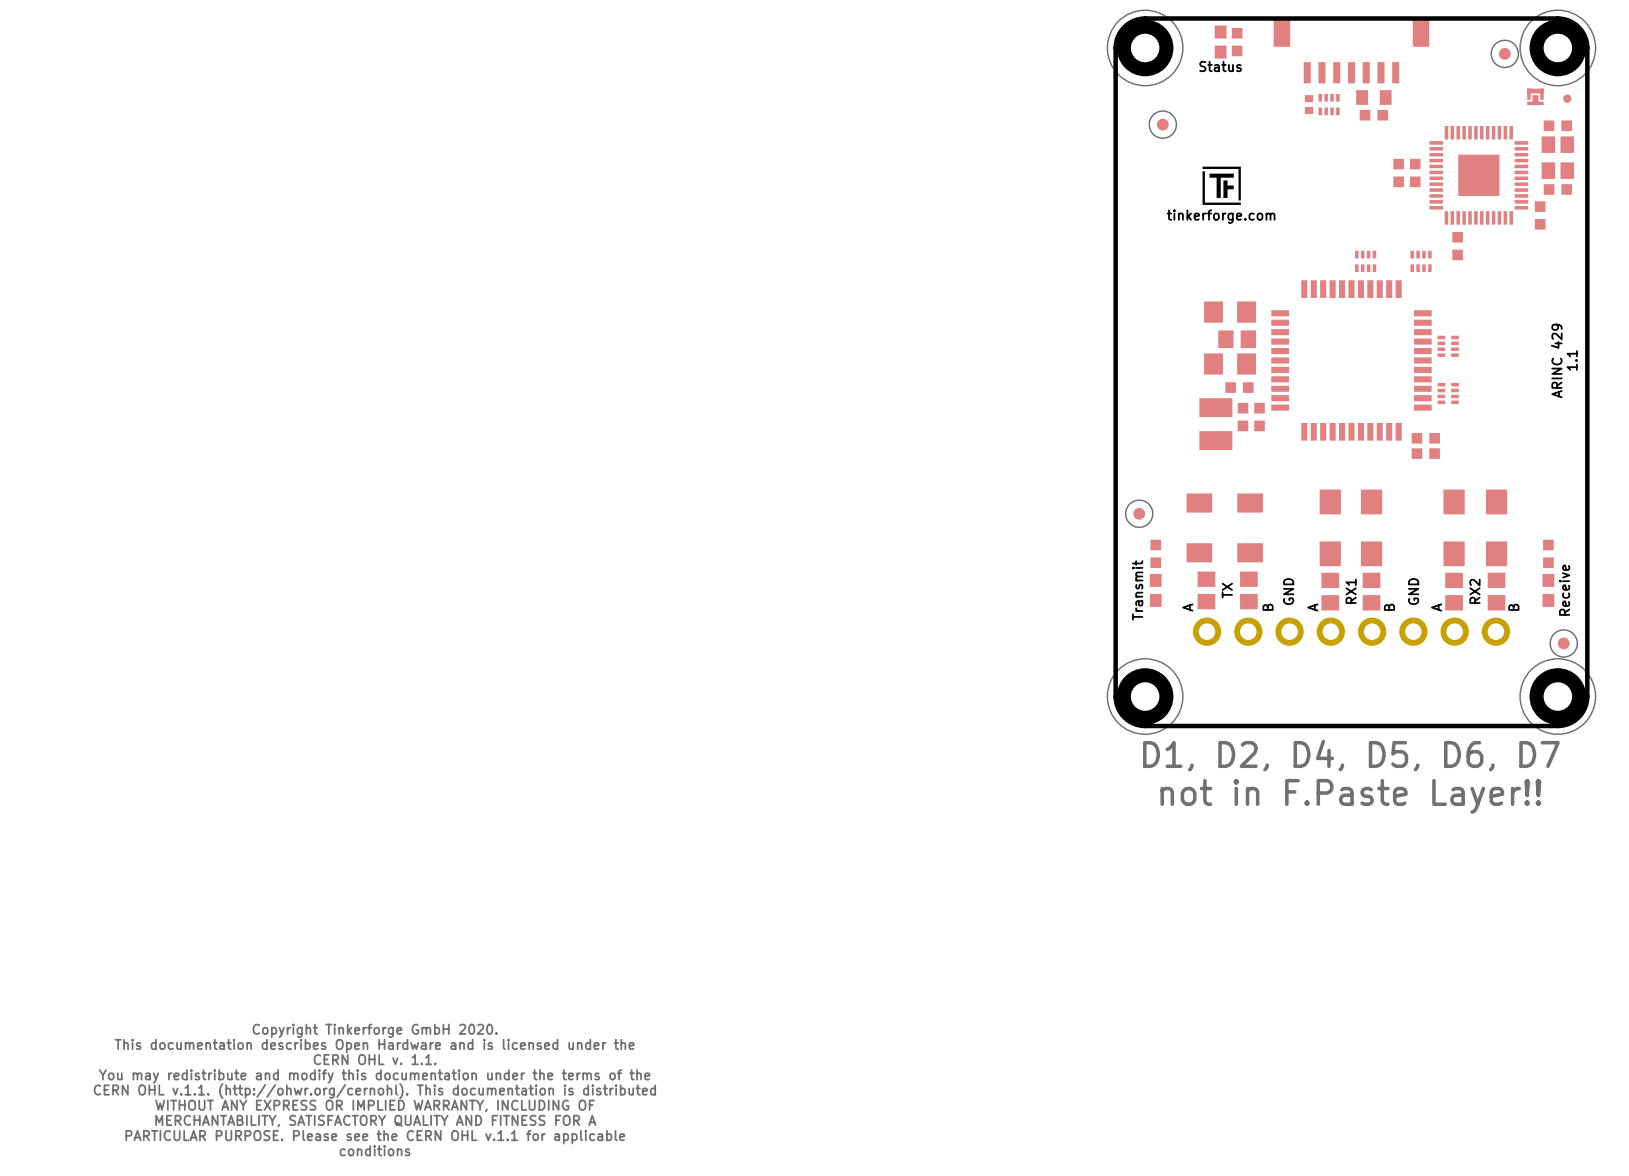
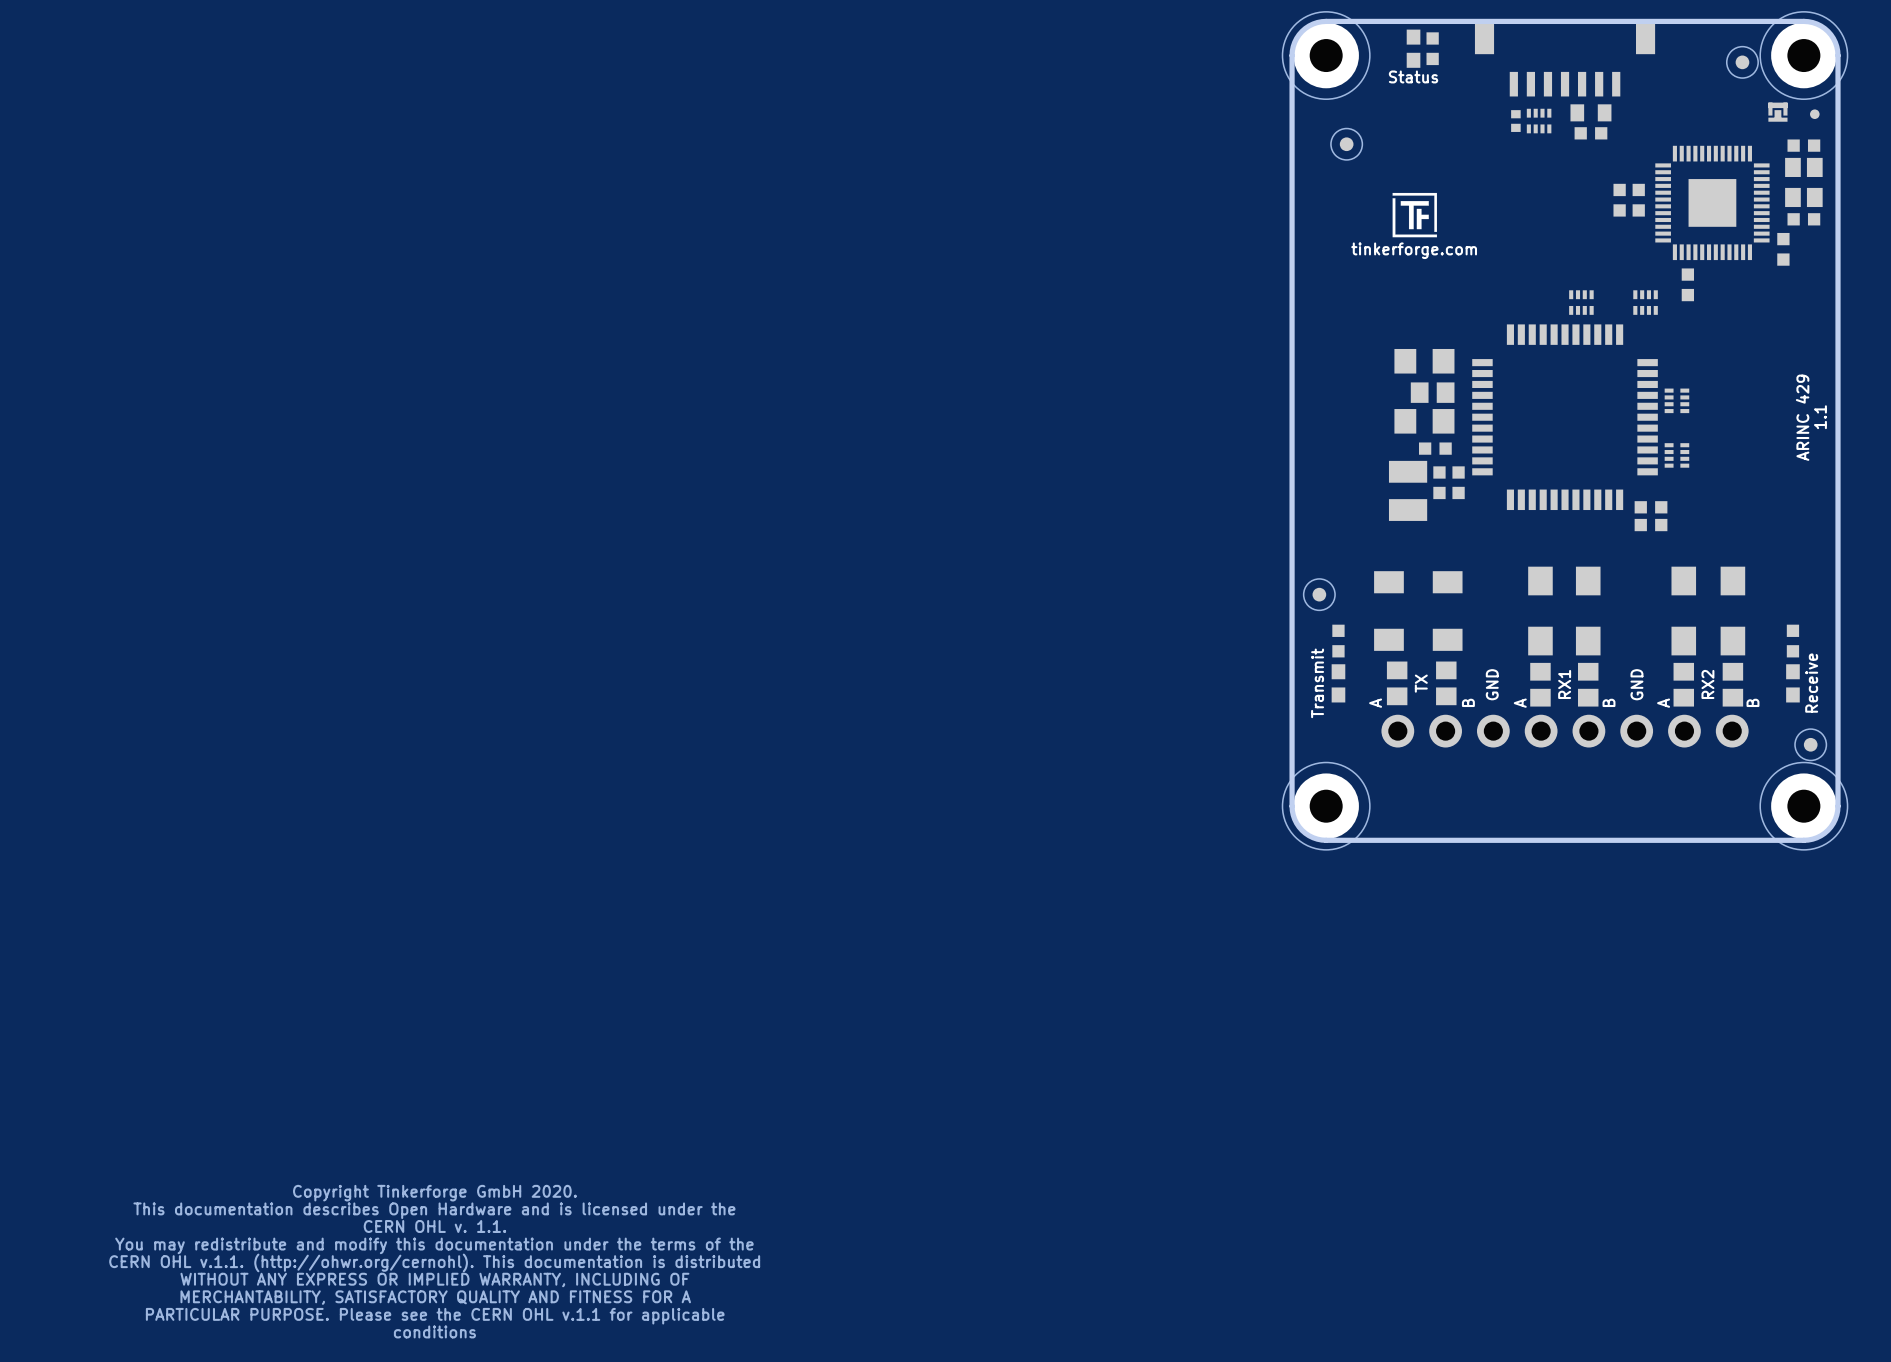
text: D1, D2, D4, D5, D6, D7 (1351, 755) -> none
text: not in F.Paste Layer!! (1350, 796) -> none

